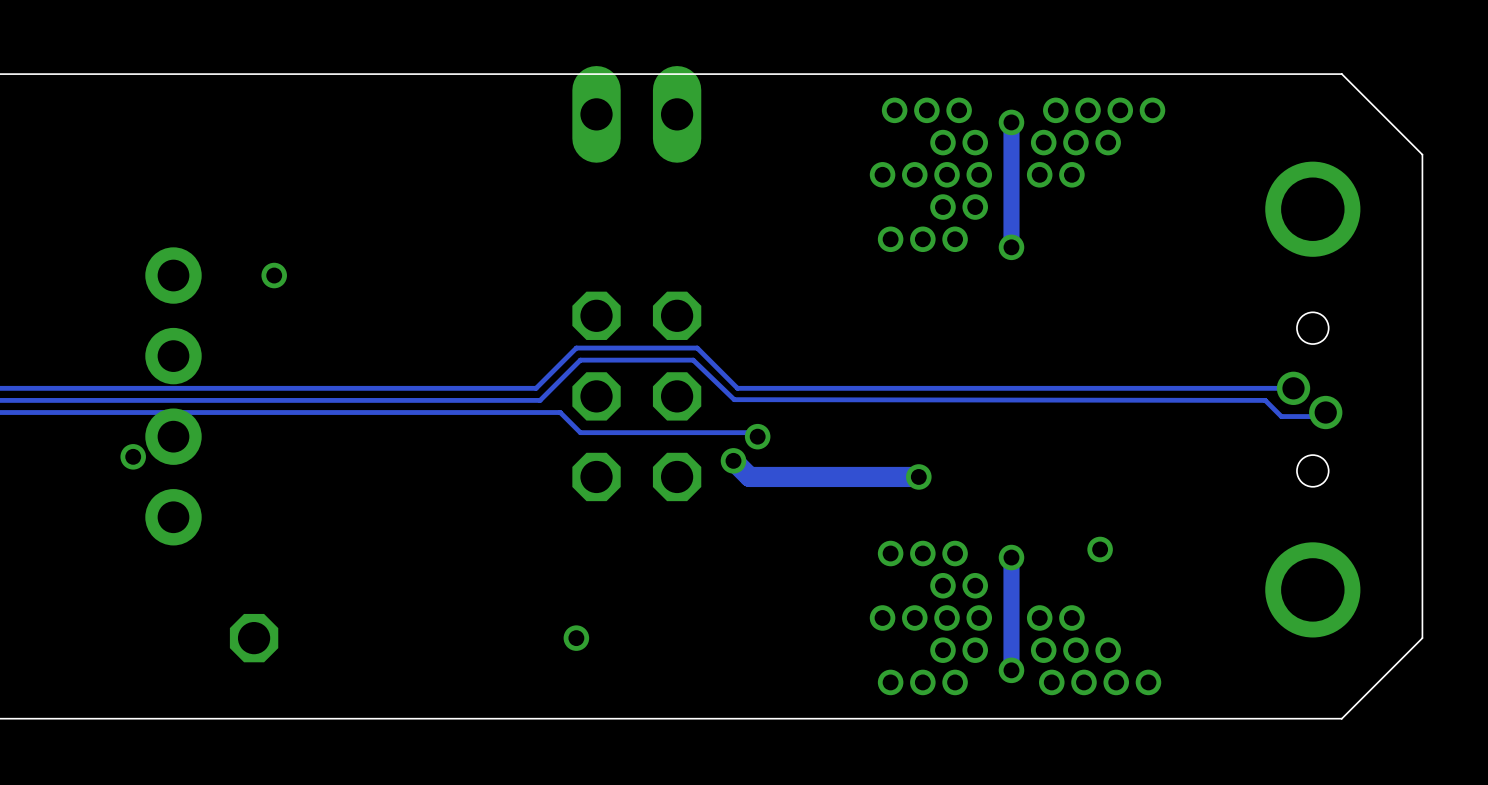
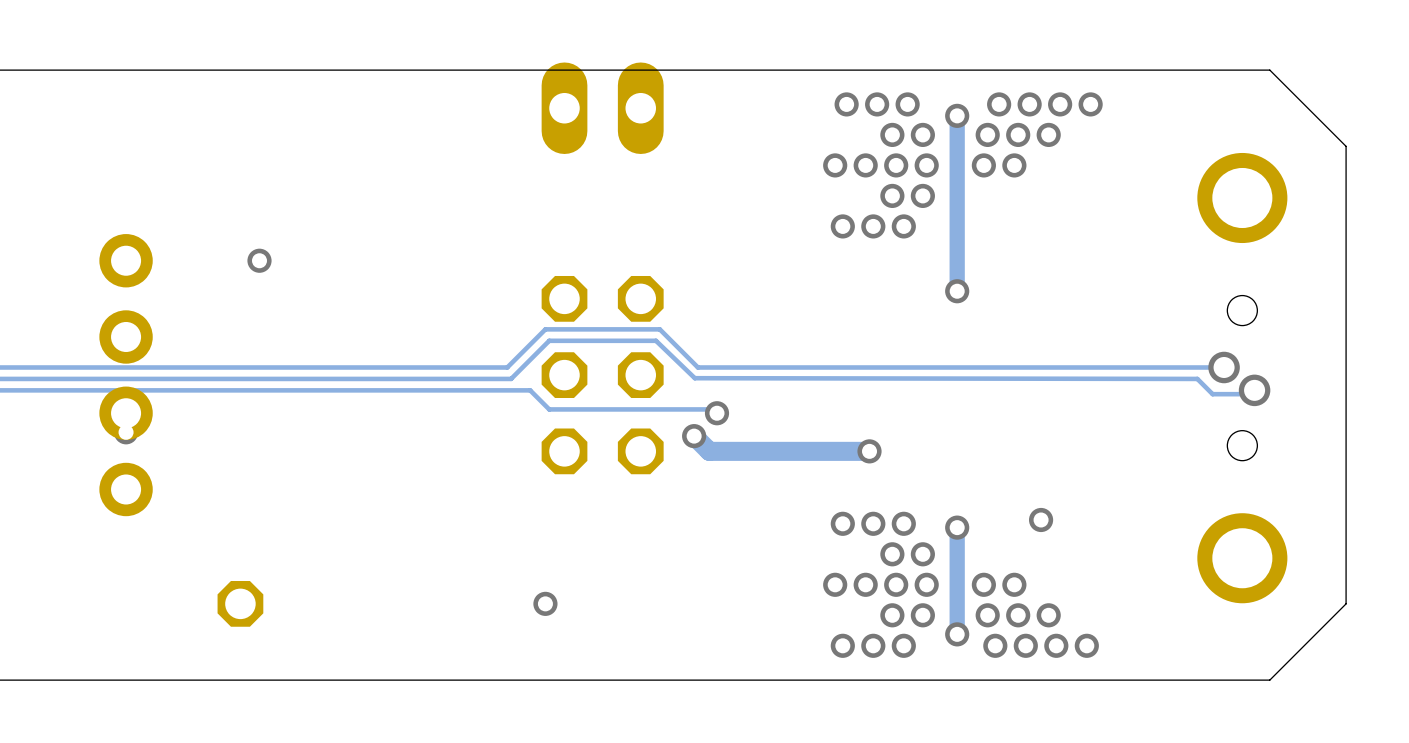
track: none -> (957, 234) (957, 291)
via position: (1011, 247) -> (957, 291)
part position: (173, 396) -> (126, 375)

